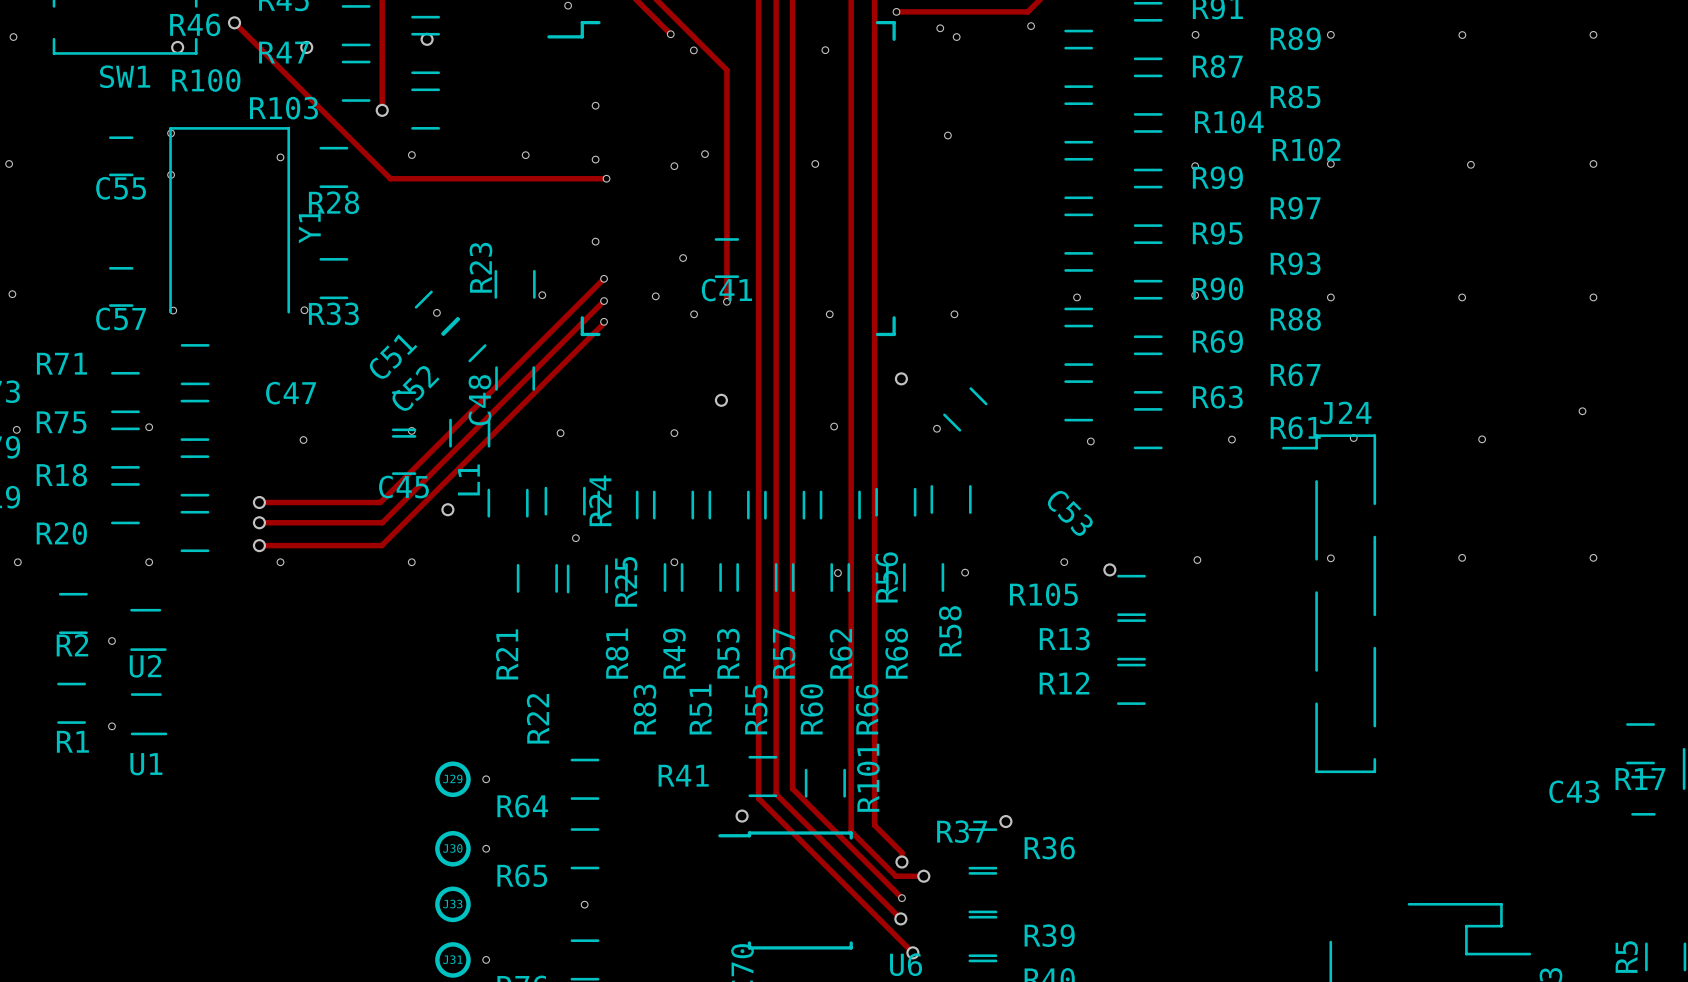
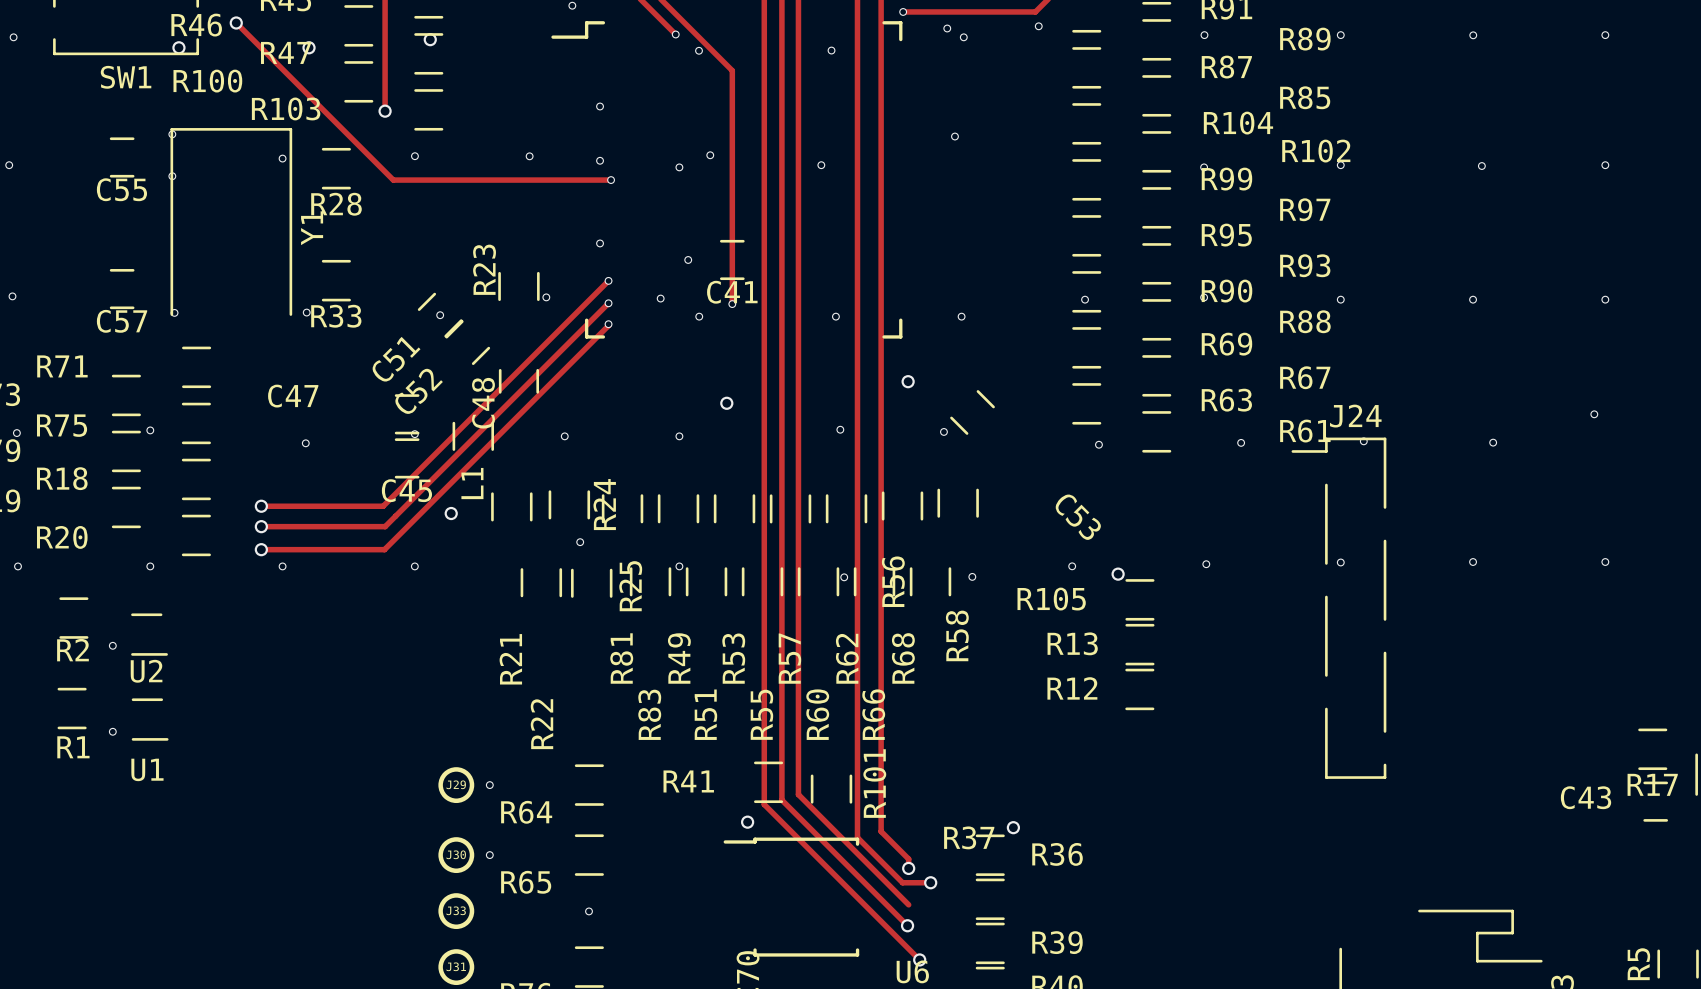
via: (901, 898) -> none
via: (486, 959) -> none

